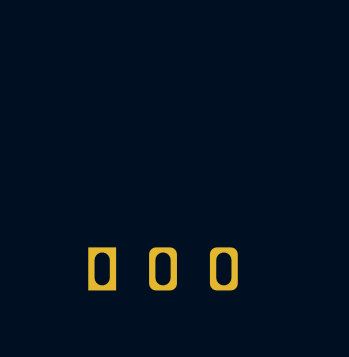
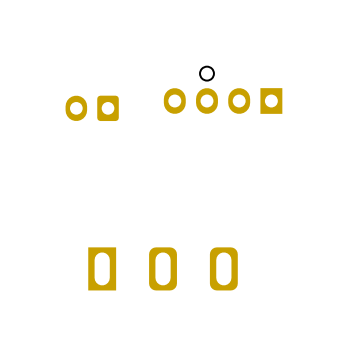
part: none -> (223, 90)
part: none -> (92, 108)

